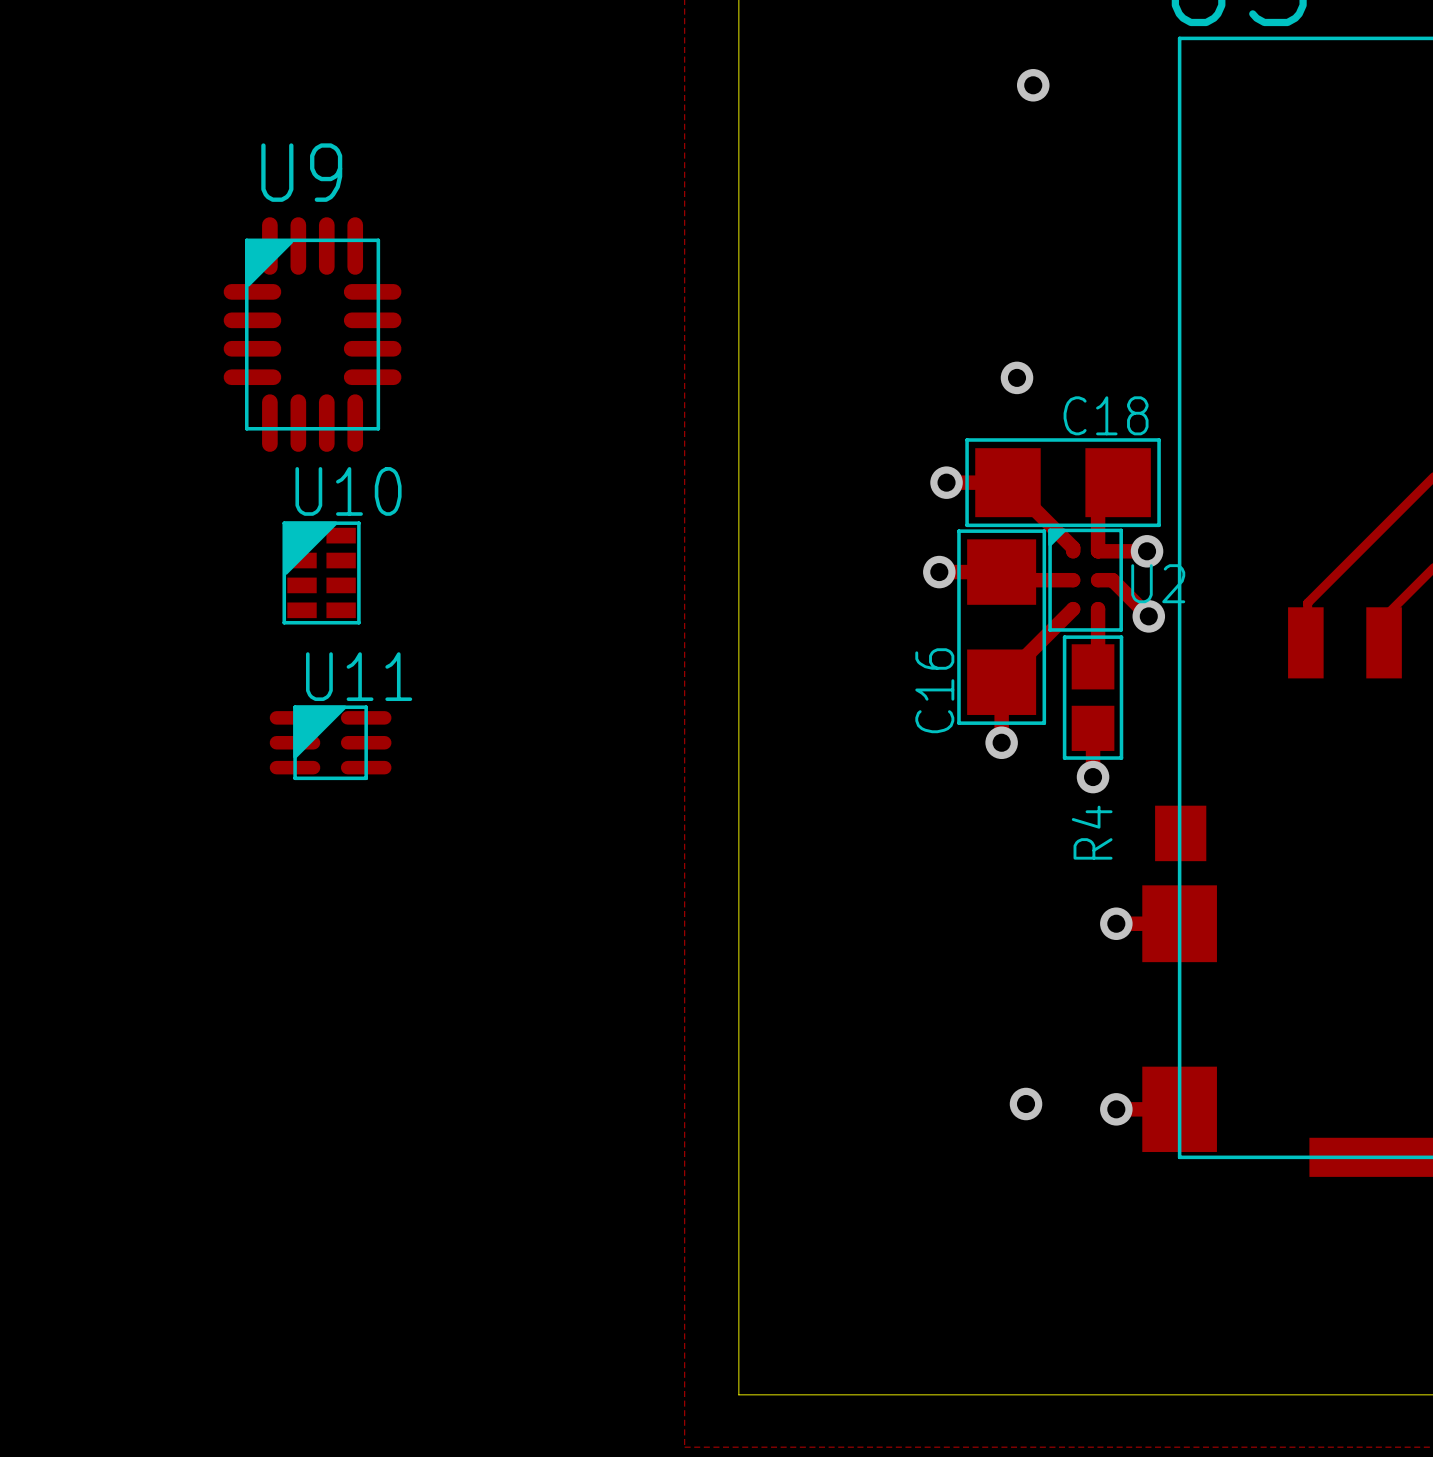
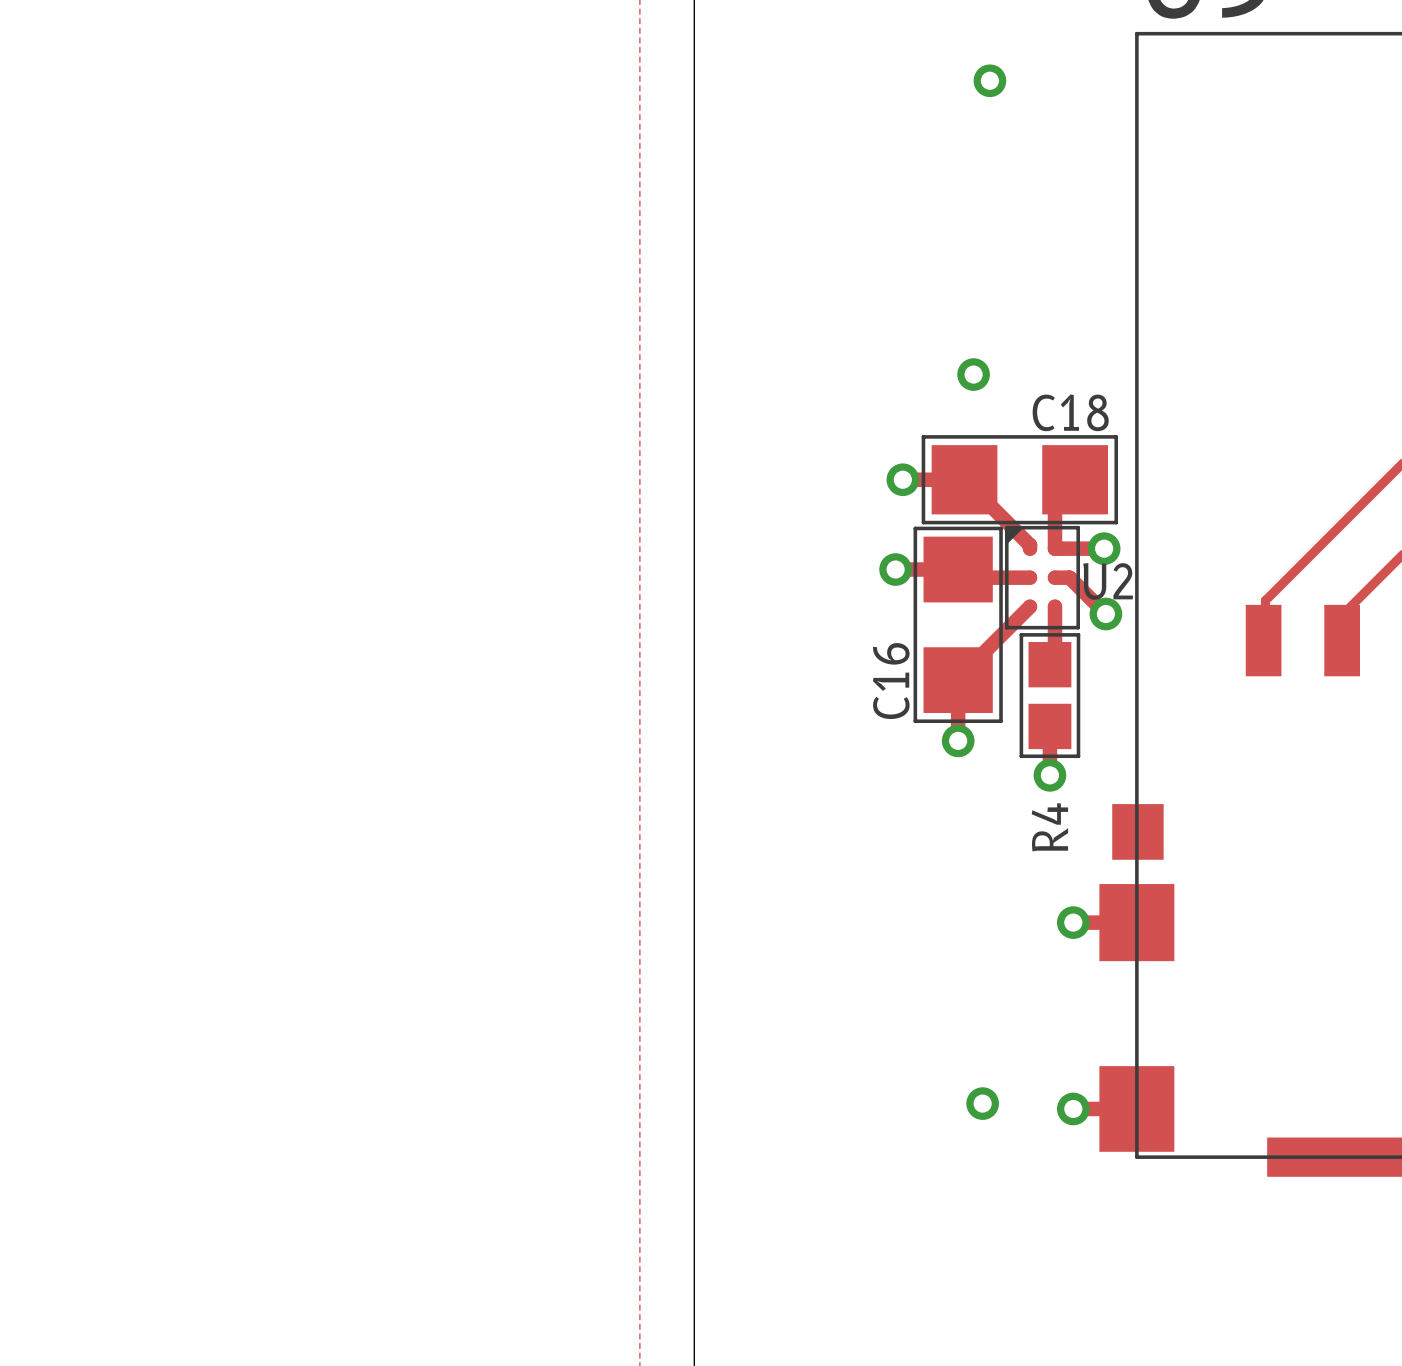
U9: (312, 334) -> none
U10: (321, 572) -> none
U11: (330, 742) -> none

